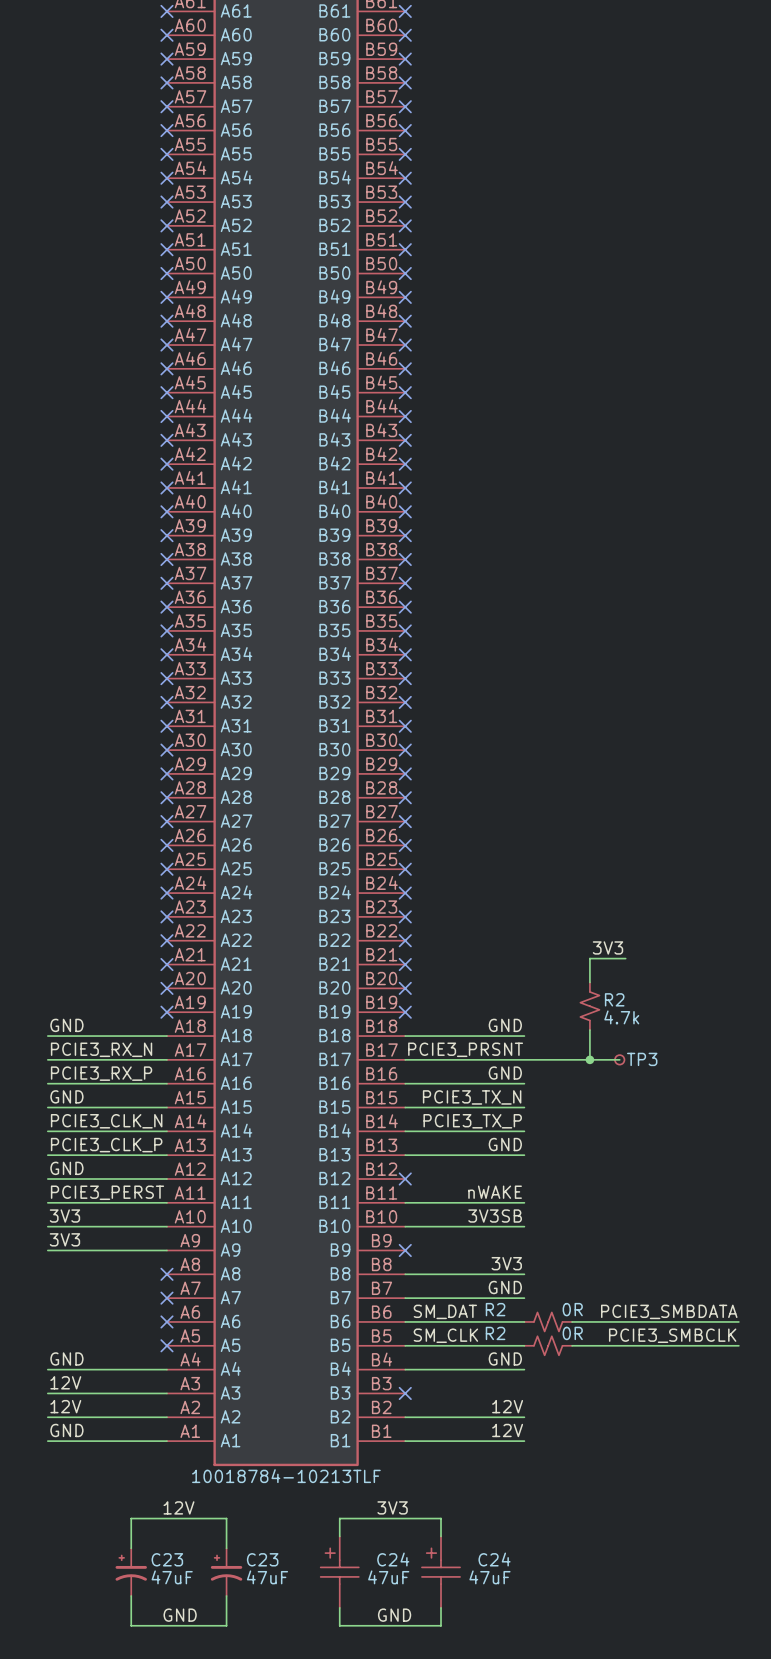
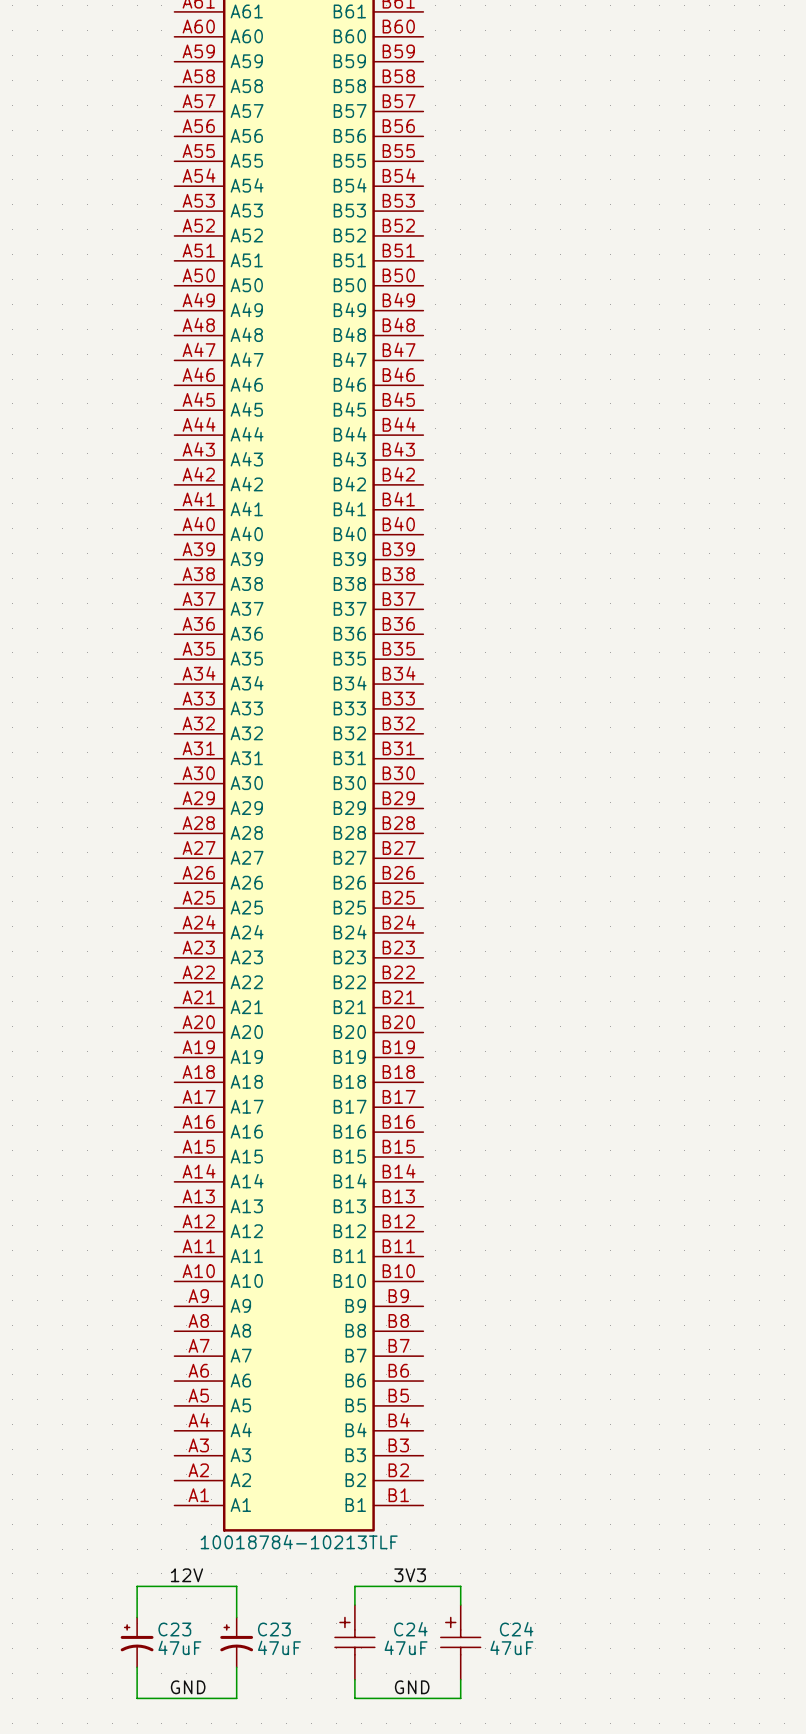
no-connect mark: (166, 11) -> none
no-connect mark: (405, 11) -> none
no-connect mark: (166, 35) -> none
no-connect mark: (405, 35) -> none
no-connect mark: (166, 59) -> none
no-connect mark: (405, 59) -> none
no-connect mark: (166, 82) -> none
no-connect mark: (405, 82) -> none
no-connect mark: (166, 106) -> none
no-connect mark: (405, 106) -> none
no-connect mark: (166, 130) -> none
no-connect mark: (405, 130) -> none
no-connect mark: (166, 154) -> none
no-connect mark: (405, 154) -> none
no-connect mark: (166, 178) -> none
no-connect mark: (405, 178) -> none
no-connect mark: (166, 202) -> none
no-connect mark: (405, 202) -> none
no-connect mark: (166, 225) -> none
no-connect mark: (405, 225) -> none
no-connect mark: (166, 249) -> none
no-connect mark: (405, 249) -> none
no-connect mark: (166, 273) -> none
no-connect mark: (405, 273) -> none
no-connect mark: (166, 297) -> none
no-connect mark: (405, 297) -> none
no-connect mark: (166, 321) -> none
no-connect mark: (405, 321) -> none
no-connect mark: (166, 345) -> none
no-connect mark: (405, 345) -> none
no-connect mark: (166, 368) -> none
no-connect mark: (405, 368) -> none
no-connect mark: (166, 392) -> none
no-connect mark: (405, 392) -> none
no-connect mark: (166, 416) -> none
no-connect mark: (405, 416) -> none
no-connect mark: (166, 440) -> none
no-connect mark: (405, 440) -> none
no-connect mark: (166, 464) -> none
no-connect mark: (405, 464) -> none
no-connect mark: (166, 487) -> none
no-connect mark: (405, 487) -> none
no-connect mark: (166, 511) -> none
no-connect mark: (405, 511) -> none
no-connect mark: (166, 535) -> none
no-connect mark: (405, 535) -> none
no-connect mark: (166, 559) -> none
no-connect mark: (405, 559) -> none
no-connect mark: (166, 583) -> none
no-connect mark: (405, 583) -> none
no-connect mark: (166, 607) -> none
no-connect mark: (405, 607) -> none
no-connect mark: (166, 630) -> none
no-connect mark: (405, 630) -> none
no-connect mark: (166, 654) -> none
no-connect mark: (405, 654) -> none
no-connect mark: (166, 678) -> none
no-connect mark: (405, 678) -> none
no-connect mark: (166, 702) -> none
no-connect mark: (405, 702) -> none
no-connect mark: (166, 726) -> none
no-connect mark: (405, 726) -> none
no-connect mark: (166, 750) -> none
no-connect mark: (405, 750) -> none
no-connect mark: (166, 773) -> none
no-connect mark: (405, 773) -> none
no-connect mark: (166, 797) -> none
no-connect mark: (405, 797) -> none
no-connect mark: (166, 821) -> none
no-connect mark: (405, 821) -> none
no-connect mark: (166, 845) -> none
no-connect mark: (405, 845) -> none
no-connect mark: (166, 869) -> none
no-connect mark: (405, 869) -> none
no-connect mark: (166, 893) -> none
no-connect mark: (405, 893) -> none
no-connect mark: (166, 916) -> none
no-connect mark: (405, 916) -> none
no-connect mark: (166, 940) -> none
no-connect mark: (405, 940) -> none
label: 3V3 (607, 947) -> none
wire: (625, 958) (589, 958) (589, 982) -> none
no-connect mark: (166, 964) -> none
no-connect mark: (405, 964) -> none
no-connect mark: (166, 988) -> none
no-connect mark: (405, 988) -> none
R2: 4.7k (589, 1006) -> none
no-connect mark: (166, 1012) -> none
no-connect mark: (405, 1012) -> none
label: GND (66, 1025) -> none
label: GND (505, 1025) -> none
wire: (589, 1030) (589, 1059) -> none
wire: (47, 1036) (166, 1036) -> none
wire: (405, 1036) (524, 1036) -> none
label: PCIE3_RX_N (101, 1049) -> none
label: PCIE3_PRSNT (465, 1049) -> none
wire: (47, 1059) (166, 1059) -> none
wire: (405, 1059) (619, 1059) -> none
junction: (589, 1059) -> none
TP3: (619, 1059) -> none
label: PCIE3_RX_P (101, 1073) -> none
label: GND (505, 1073) -> none
wire: (47, 1083) (166, 1083) -> none
wire: (405, 1083) (524, 1083) -> none
label: GND (66, 1096) -> none
label: PCIE3_TX_N (472, 1097) -> none
wire: (47, 1107) (166, 1107) -> none
wire: (405, 1107) (524, 1107) -> none
label: PCIE3_CLK_N (106, 1121) -> none
label: PCIE3_TX_P (472, 1121) -> none
wire: (47, 1131) (166, 1131) -> none
wire: (405, 1131) (524, 1131) -> none
label: GND (505, 1144) -> none
label: PCIE3_CLK_P (106, 1145) -> none
wire: (47, 1155) (166, 1155) -> none
wire: (405, 1155) (524, 1155) -> none
label: GND (66, 1168) -> none
wire: (47, 1179) (166, 1179) -> none
no-connect mark: (405, 1179) -> none
label: PCIE3_PERST (107, 1192) -> none
label: nWAKE (495, 1192) -> none
wire: (47, 1202) (166, 1202) -> none
wire: (405, 1202) (524, 1202) -> none
label: 3V3 (64, 1216) -> none
label: 3V3SB (495, 1216) -> none
wire: (47, 1226) (166, 1226) -> none
wire: (405, 1226) (524, 1226) -> none
label: 3V3 (64, 1239) -> none
wire: (47, 1250) (166, 1250) -> none
no-connect mark: (405, 1250) -> none
label: 3V3 (506, 1263) -> none
no-connect mark: (166, 1274) -> none
wire: (405, 1274) (524, 1274) -> none
label: GND (505, 1287) -> none
no-connect mark: (166, 1298) -> none
wire: (405, 1298) (524, 1298) -> none
label: SM_DAT (445, 1311) -> none
label: PCIE3_SMBDATA (669, 1311) -> none
no-connect mark: (166, 1321) -> none
wire: (405, 1321) (524, 1321) -> none
R2: 0R (548, 1321) -> none
wire: (572, 1321) (738, 1321) -> none
label: SM_CLK (445, 1335) -> none
label: PCIE3_SMBCLK (672, 1335) -> none
no-connect mark: (166, 1345) -> none
wire: (405, 1345) (524, 1345) -> none
R2: 0R (548, 1345) -> none
wire: (572, 1345) (738, 1345) -> none
label: GND (66, 1358) -> none
label: GND (505, 1358) -> none
wire: (47, 1369) (166, 1369) -> none
wire: (405, 1369) (524, 1369) -> none
label: 12V (65, 1382) -> none
wire: (47, 1393) (166, 1393) -> none
no-connect mark: (405, 1393) -> none
label: 12V (65, 1406) -> none
label: 12V (507, 1406) -> none
wire: (47, 1417) (166, 1417) -> none
wire: (405, 1417) (524, 1417) -> none
label: GND (66, 1430) -> none
label: 12V (507, 1430) -> none
wire: (47, 1441) (166, 1441) -> none
wire: (405, 1441) (524, 1441) -> none

